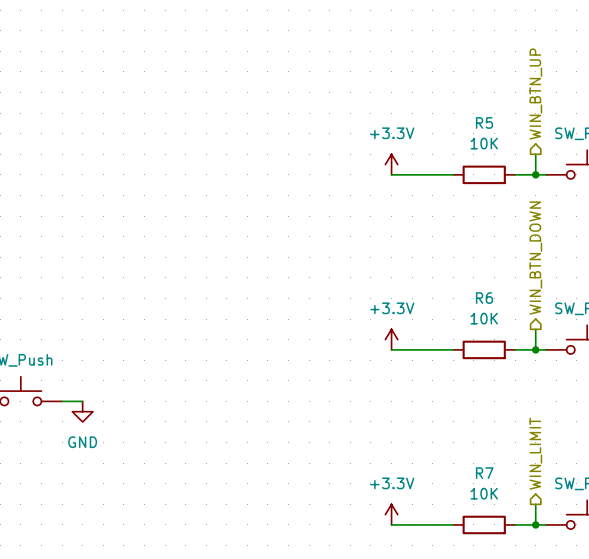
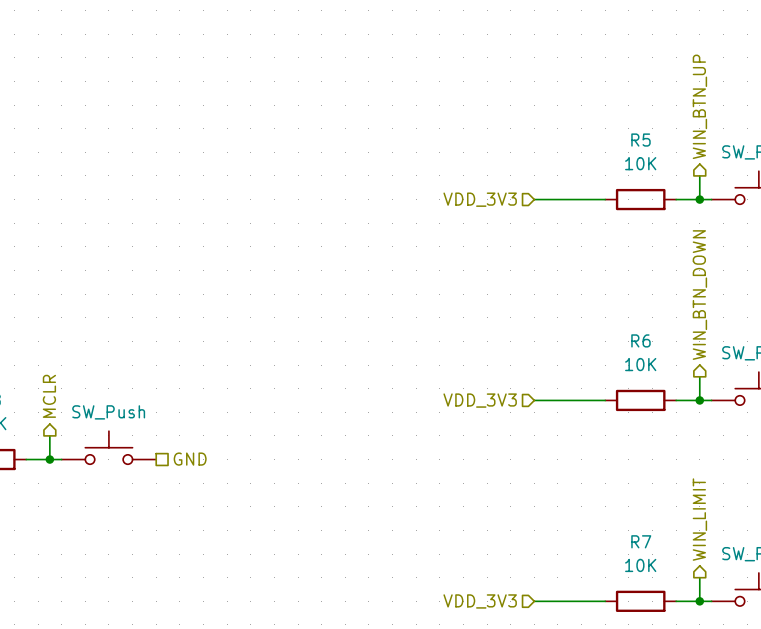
power symbol: +3.3V (391, 164) -> none
hierarchical label: none -> VDD_3V3 (480, 199)
power symbol: +3.3V (391, 339) -> none
hierarchical label: none -> VDD_3V3 (480, 400)
wire: (62, 401) (82, 401) -> none
hierarchical label: none -> GND (190, 459)
power symbol: GND (82, 411) -> none
power symbol: +3.3V (391, 514) -> none
hierarchical label: none -> VDD_3V3 (480, 601)

